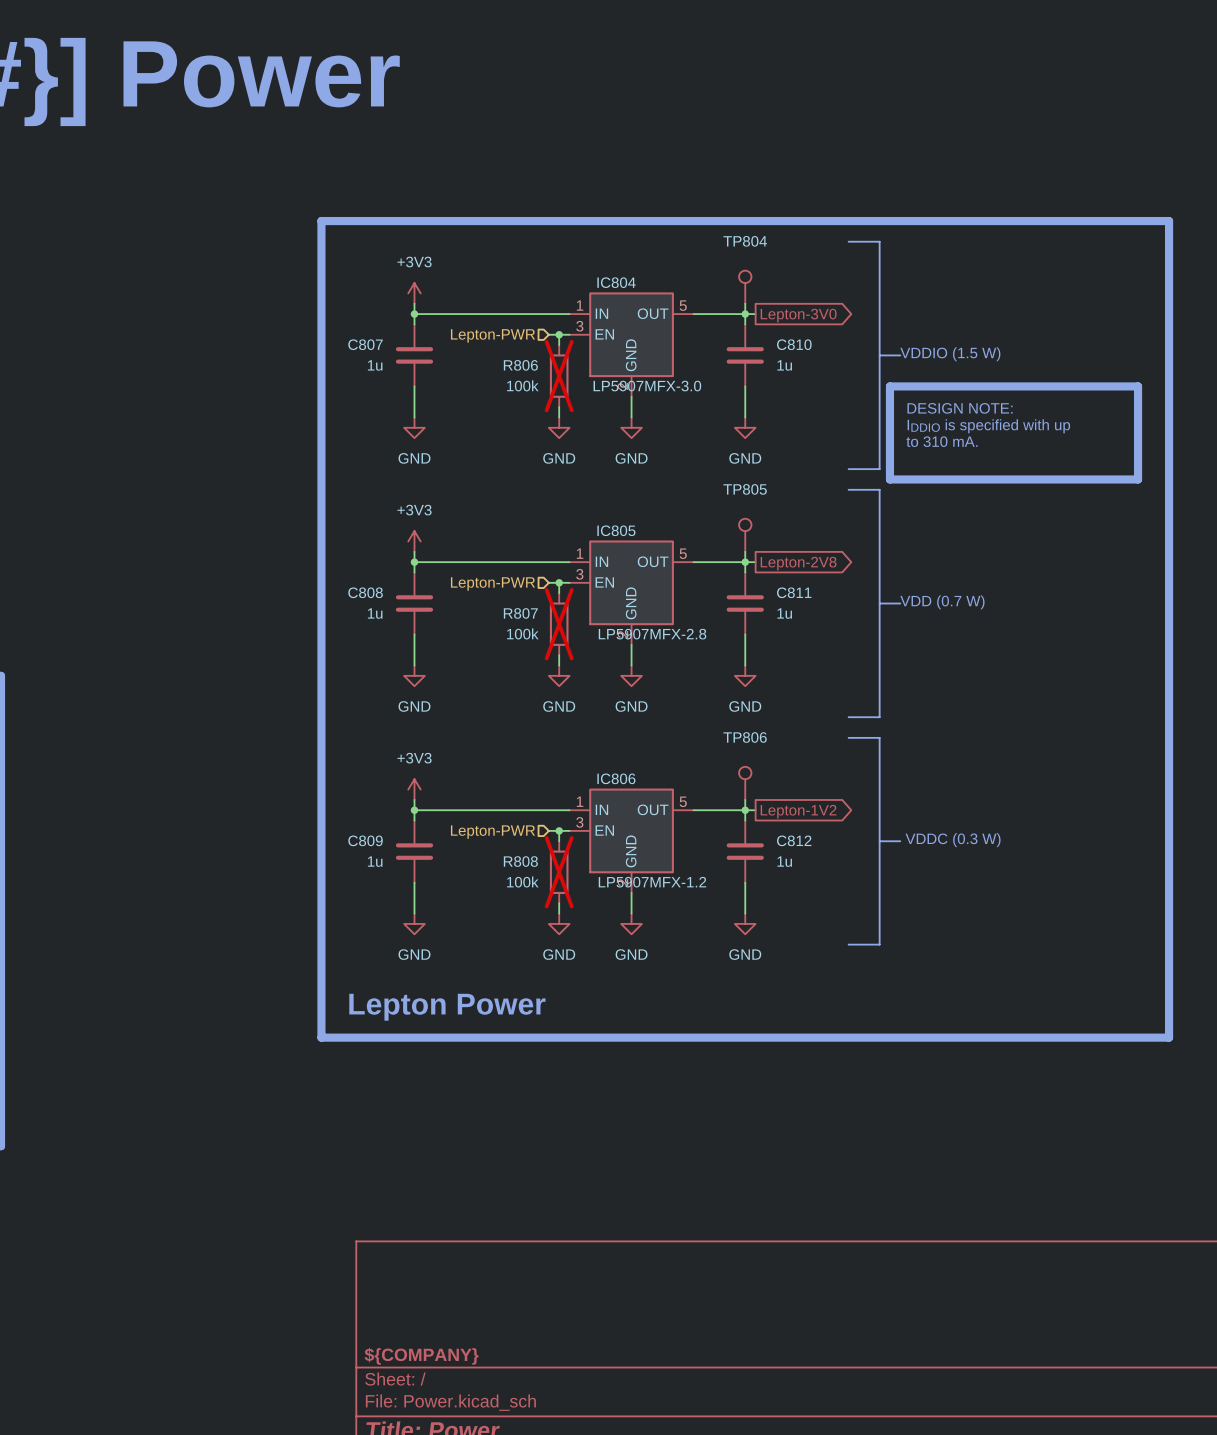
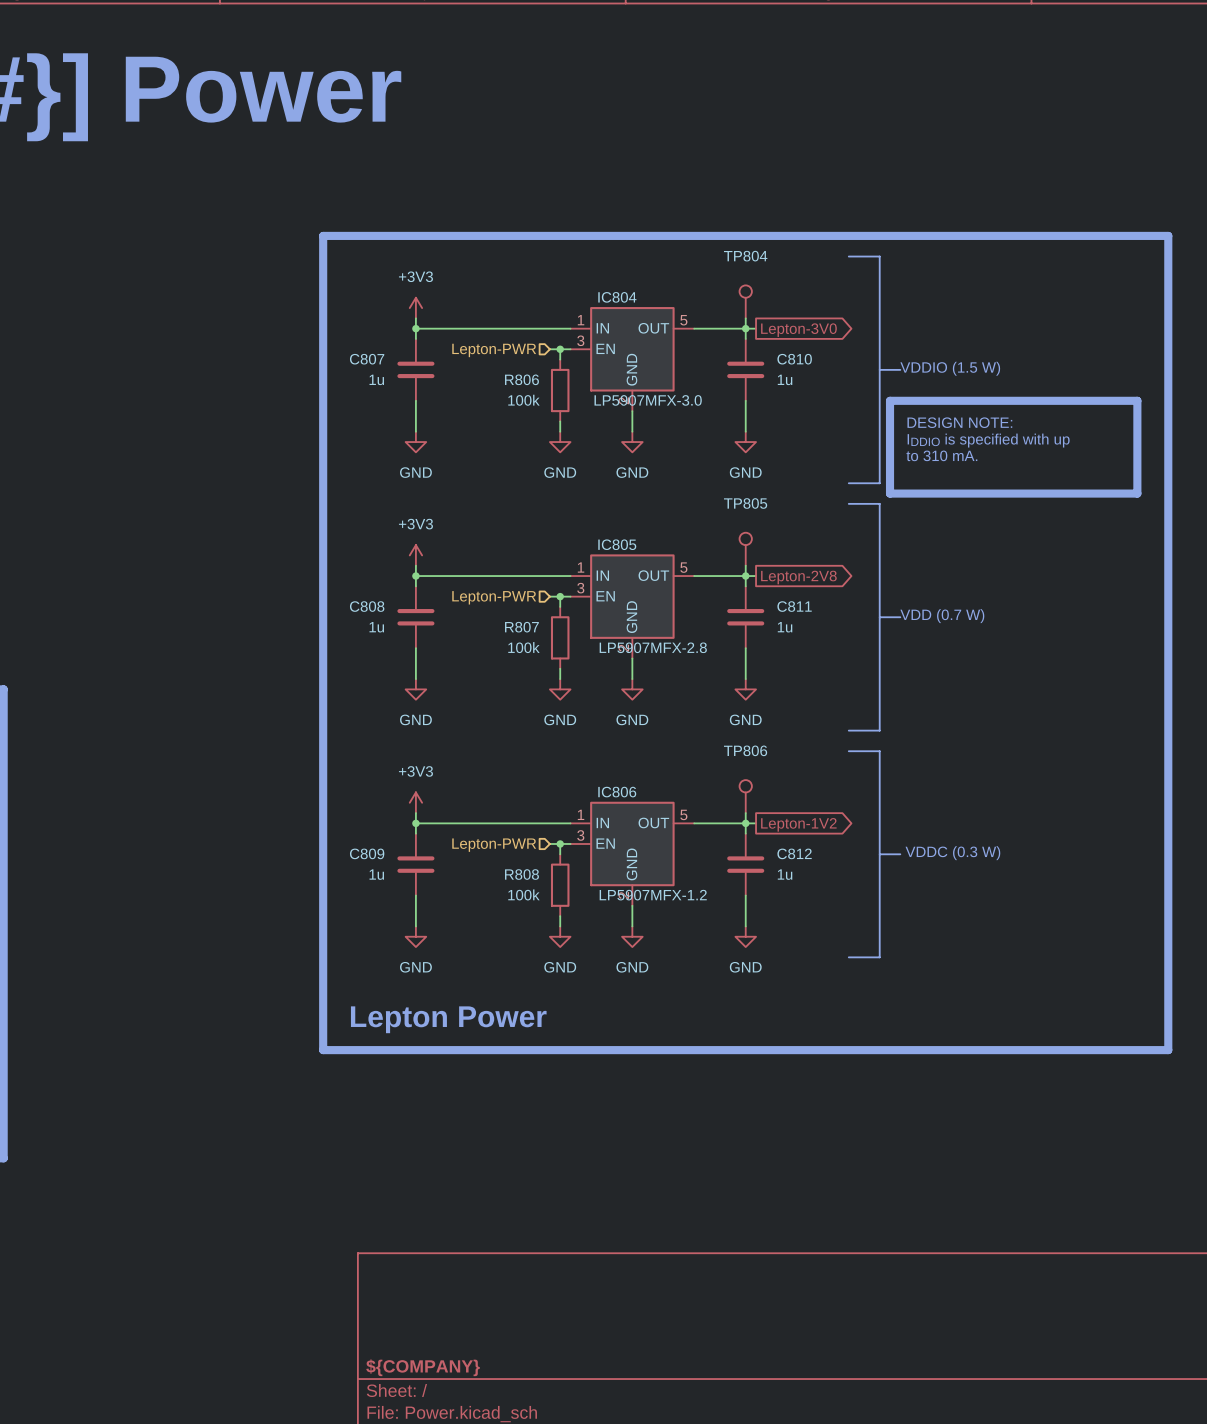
R806 do-not-place cross: (559, 376) -> none
R807 do-not-place cross: (559, 624) -> none
R808 do-not-place cross: (559, 872) -> none

